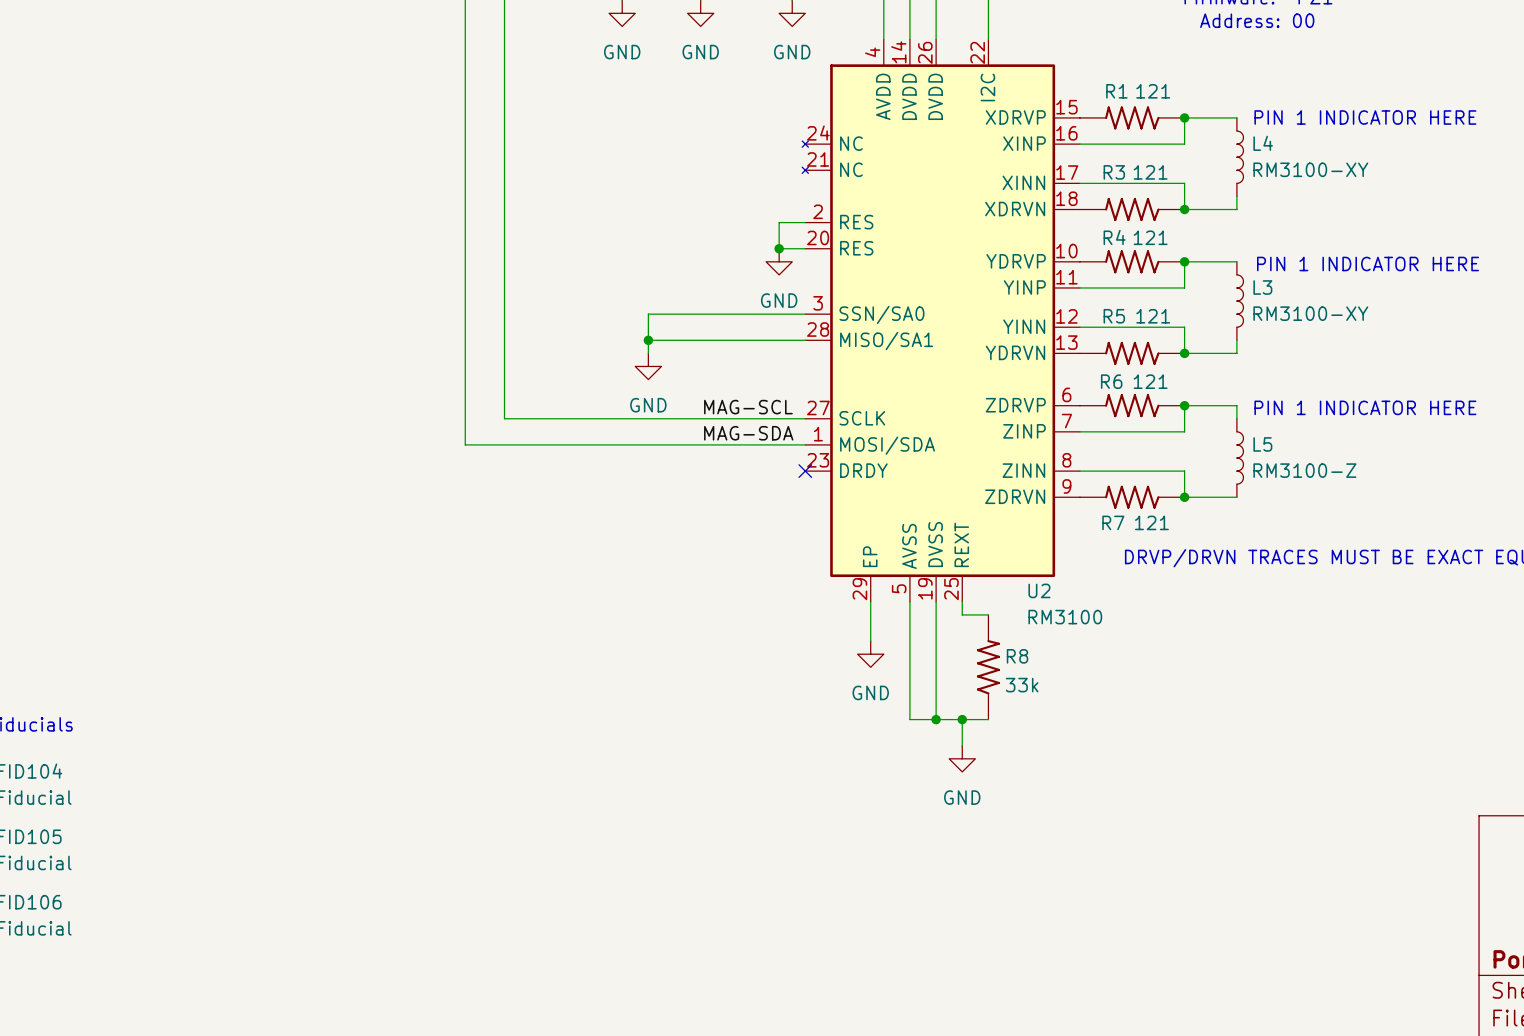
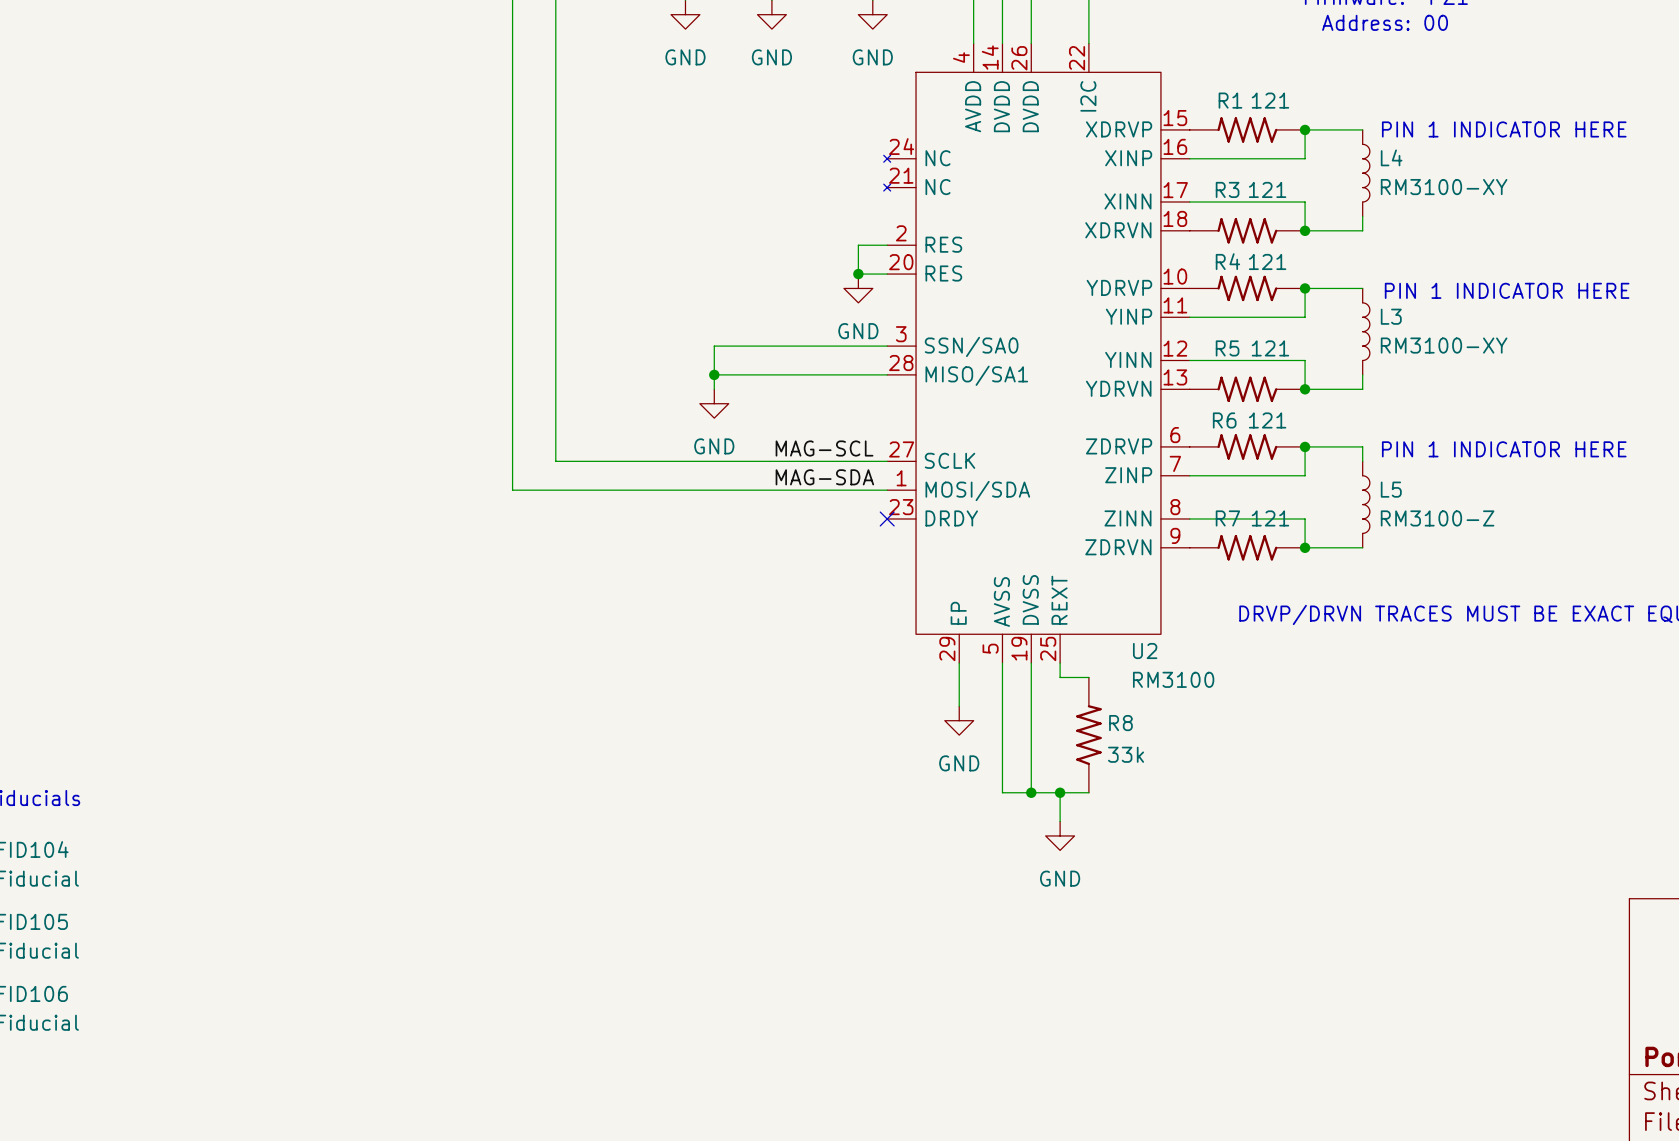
U2 symbol: [802, 39, 1080, 602] -> [883, 43, 1190, 664]
R7 name position: R7 (1113, 522) -> R7 (1227, 518)
R7 value position: 121 (1151, 522) -> 121 (1270, 518)

